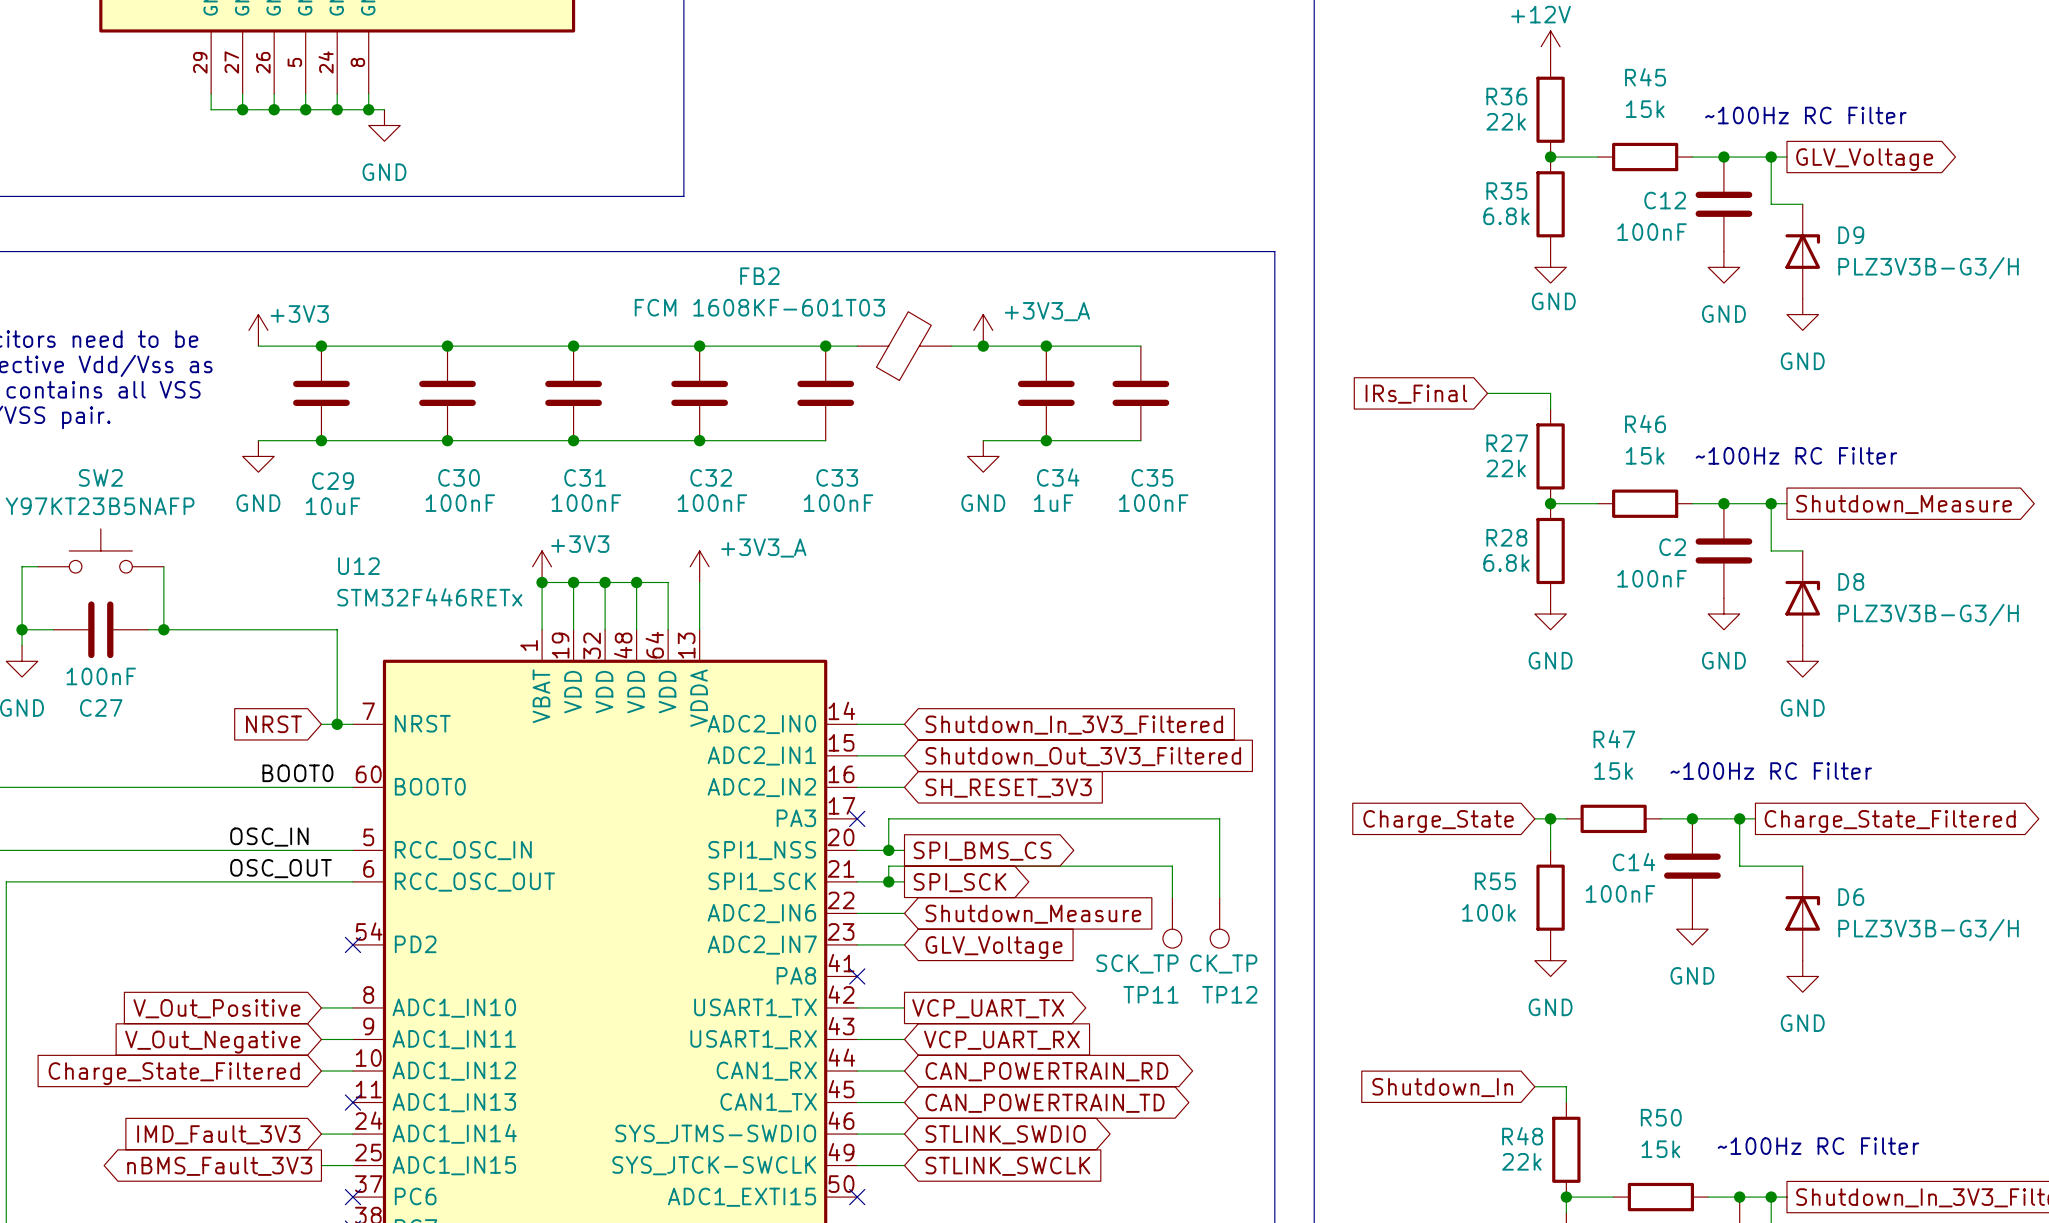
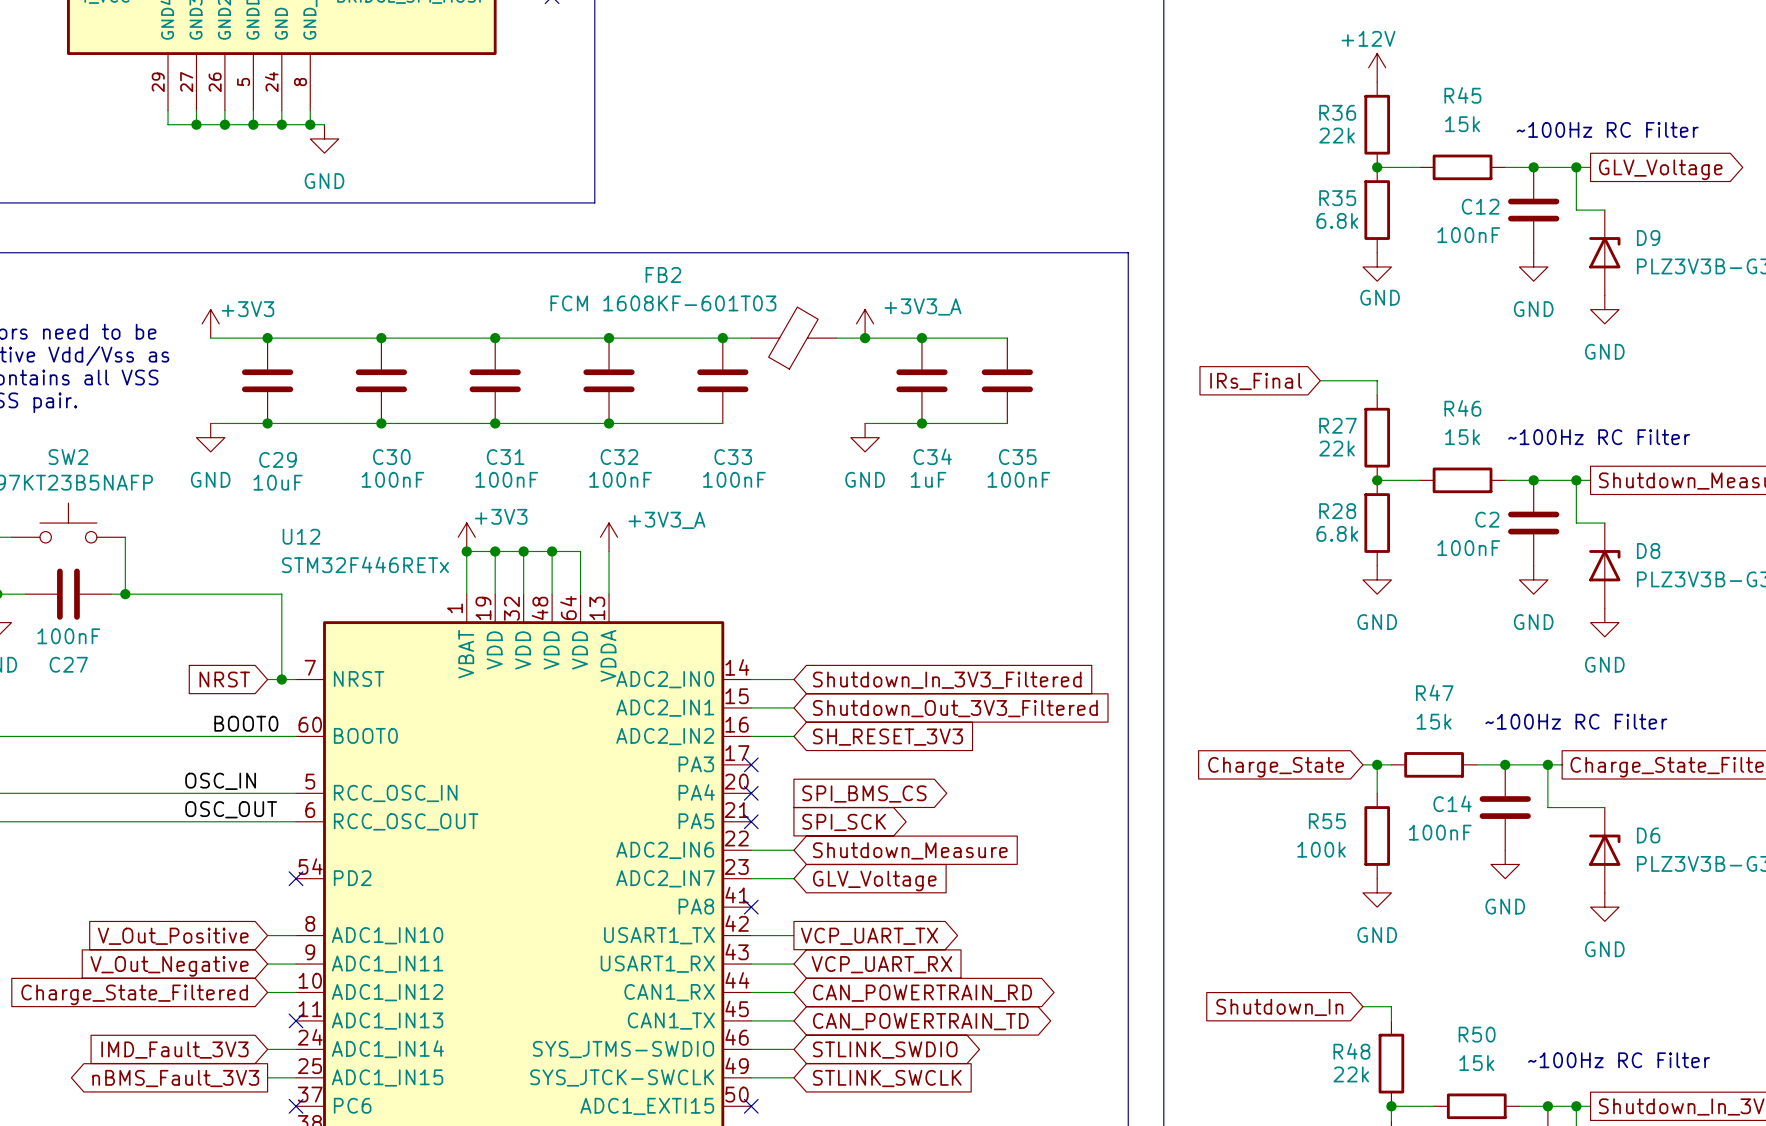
U12 pin name: SPI1_NSS (762, 850) -> PA4 (696, 792)
wire: (857, 850) (904, 850) -> none
no-connect mark: none -> (751, 793)
wire: (888, 850) (888, 818) (1219, 818) (1219, 897) -> none
junction: (888, 850) -> none
wire: (857, 881) (904, 881) -> none
no-connect mark: none -> (751, 821)
wire: (888, 881) (888, 866) (1172, 866) (1172, 897) -> none
junction: (888, 881) -> none
U12 pin name: SPI1_SCK (762, 882) -> PA5 (696, 821)
TP11: SCK_TP (1172, 922) -> none
TP12: CK_TP (1219, 922) -> none

